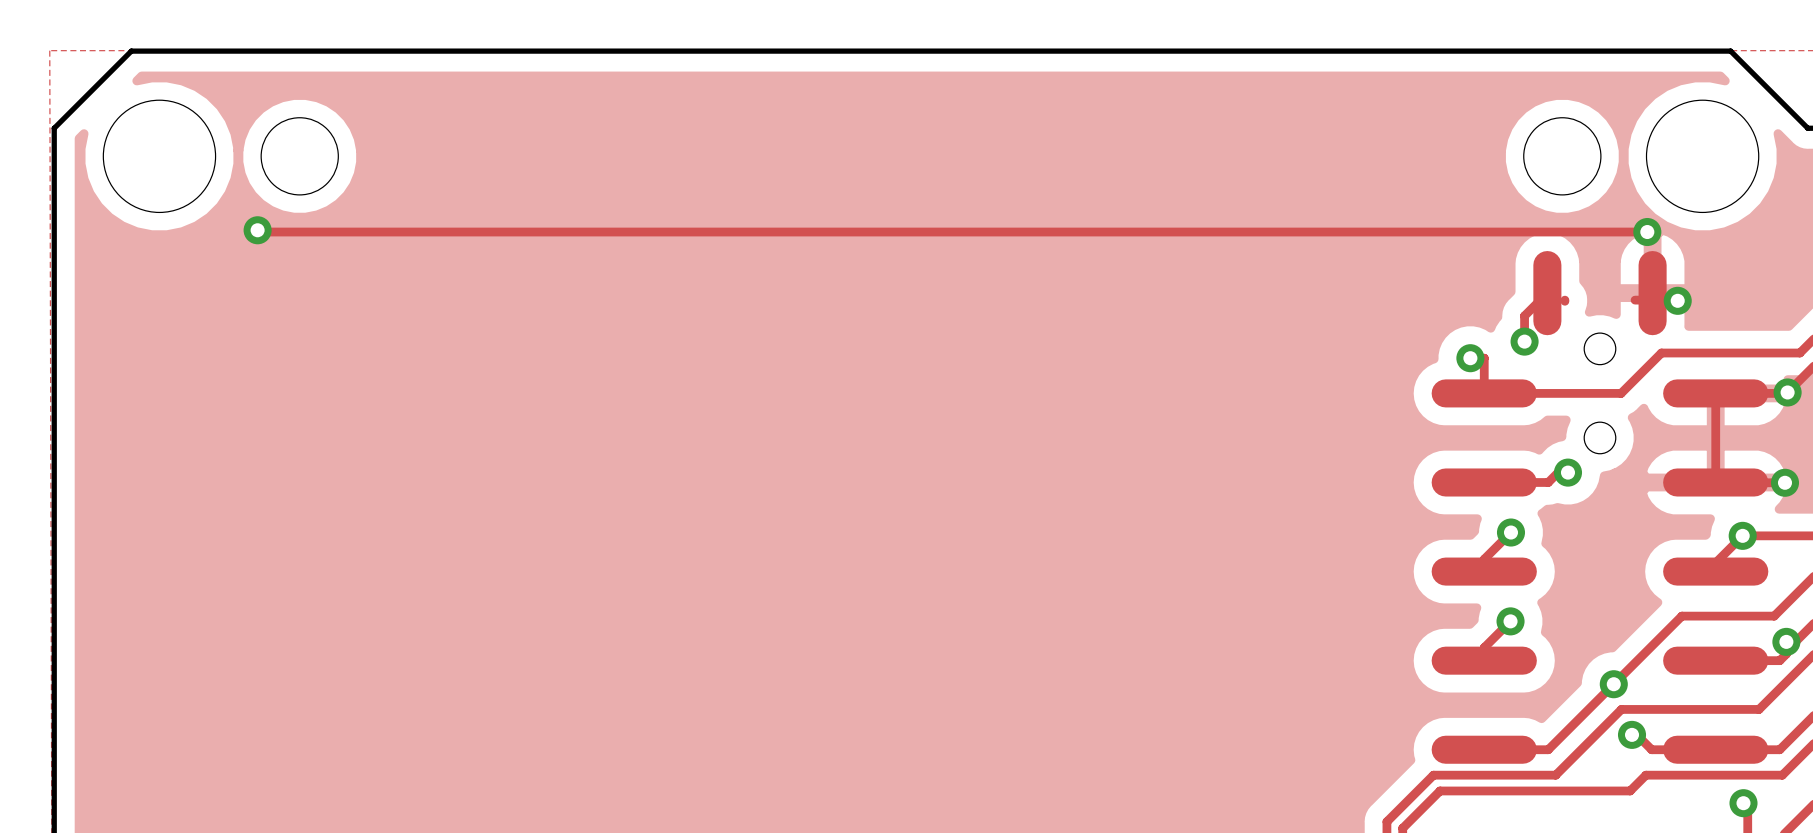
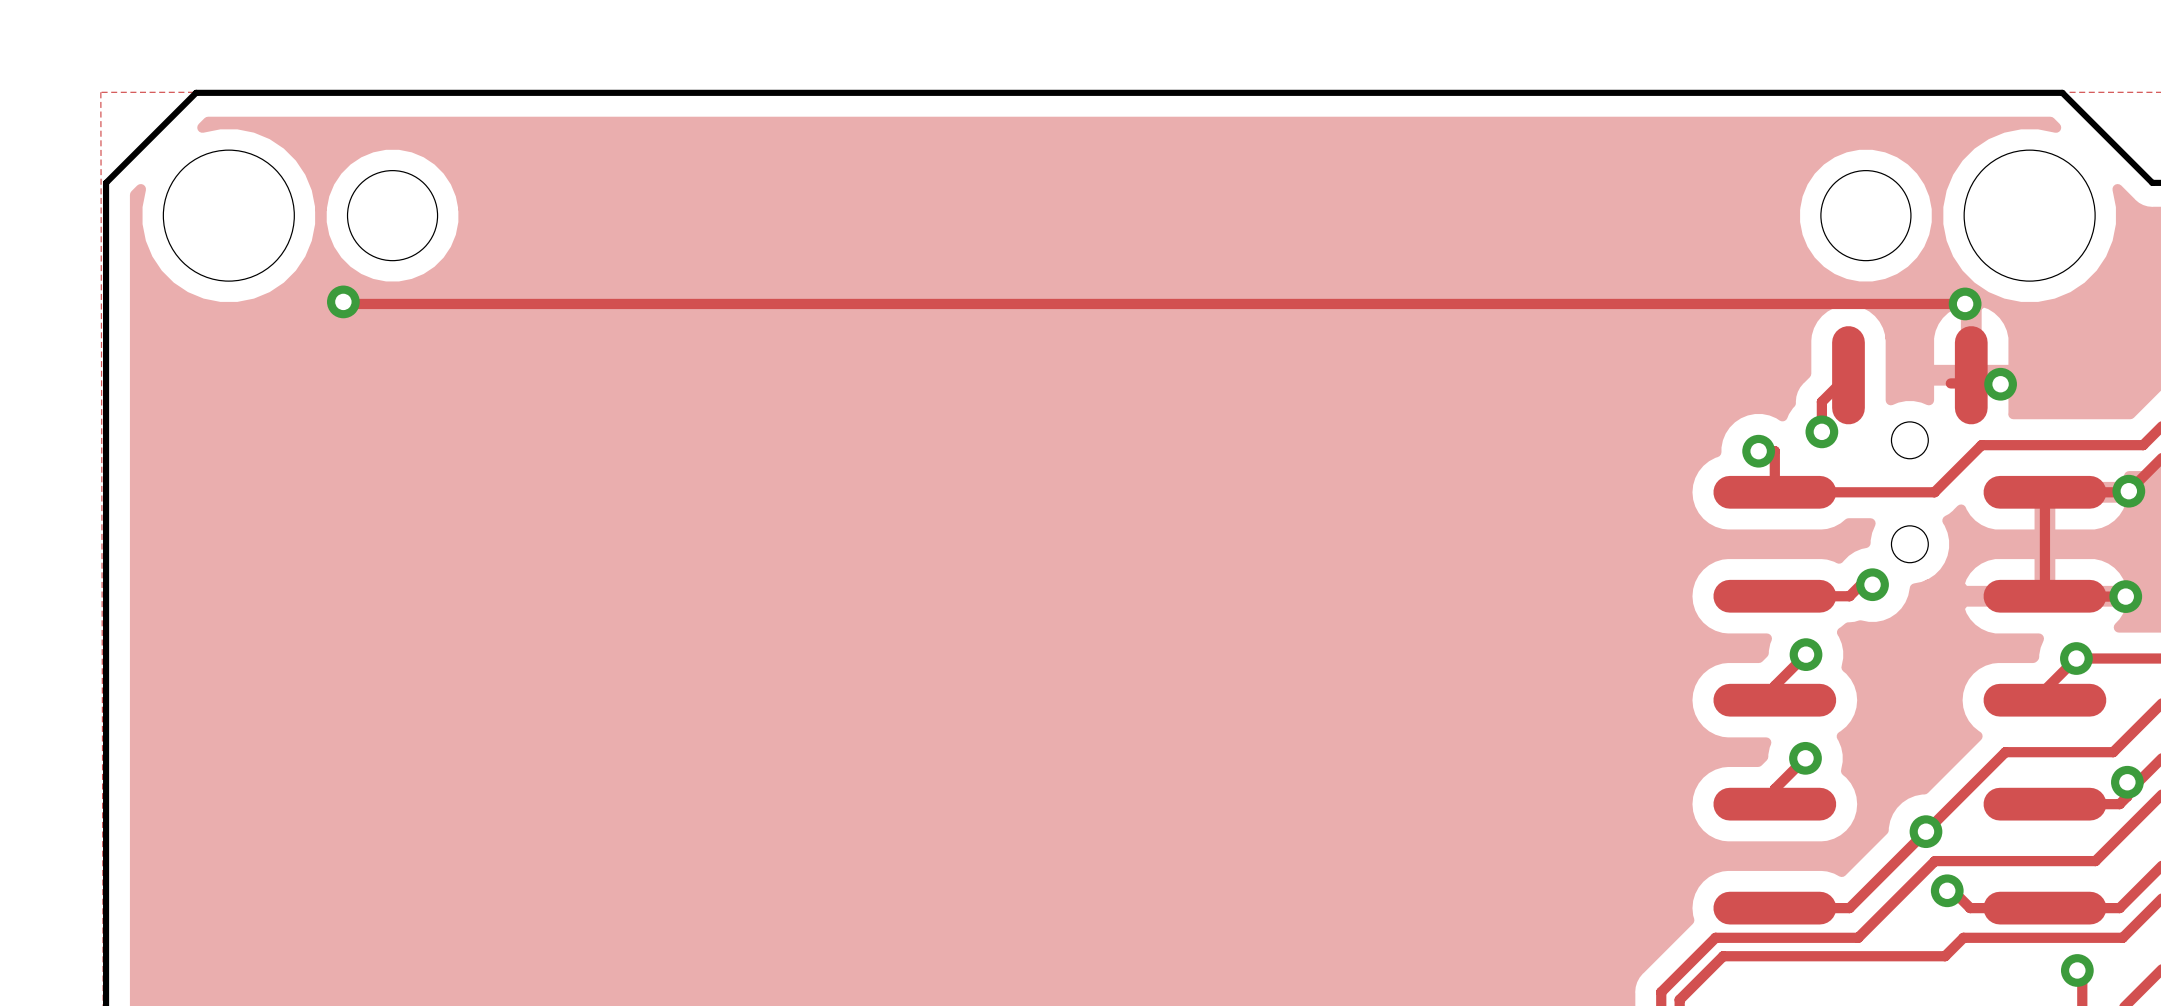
track: (1564, 300) (1564, 301) -> none

